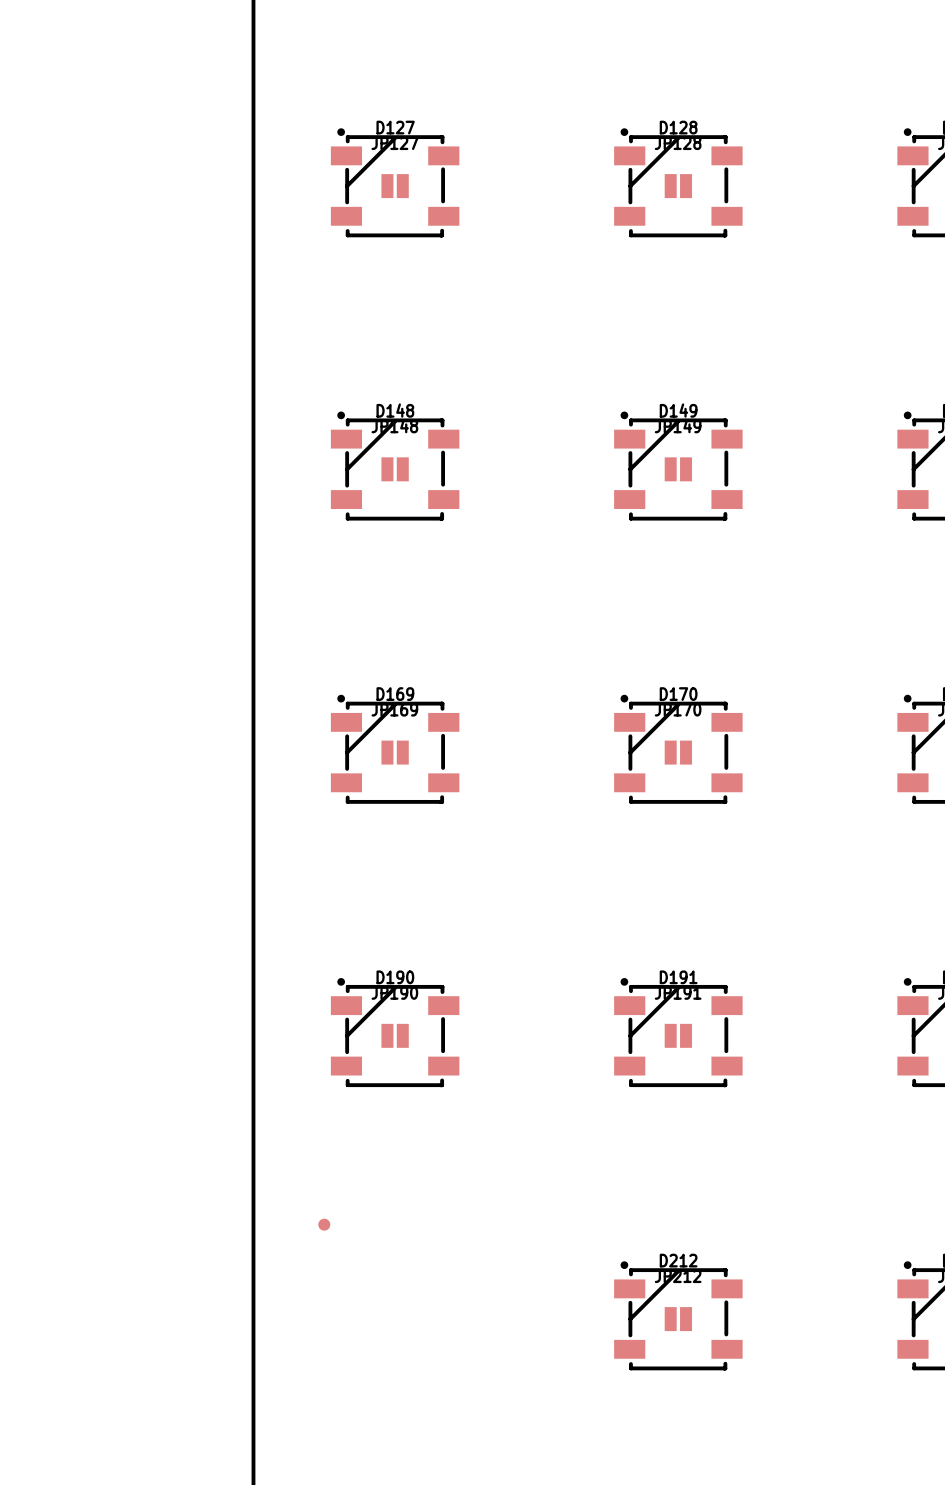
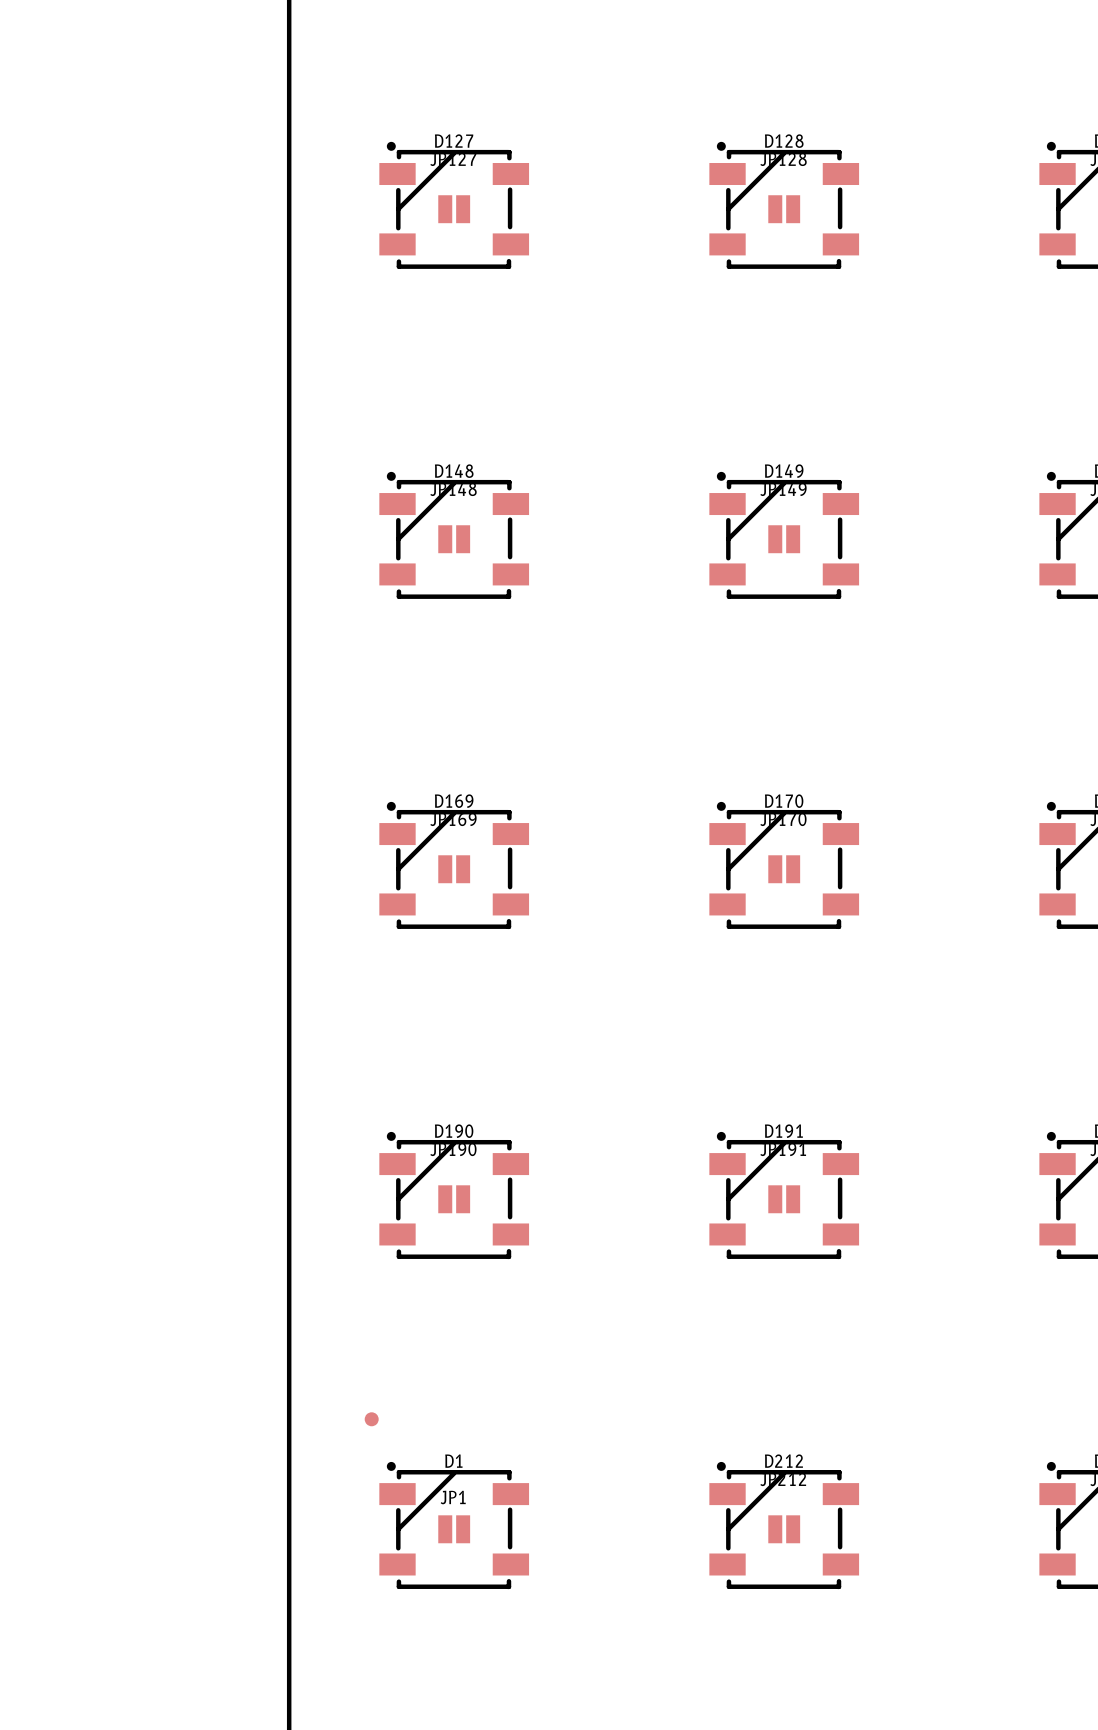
D1: none -> (454, 1525)
JP1: none -> (454, 1529)

